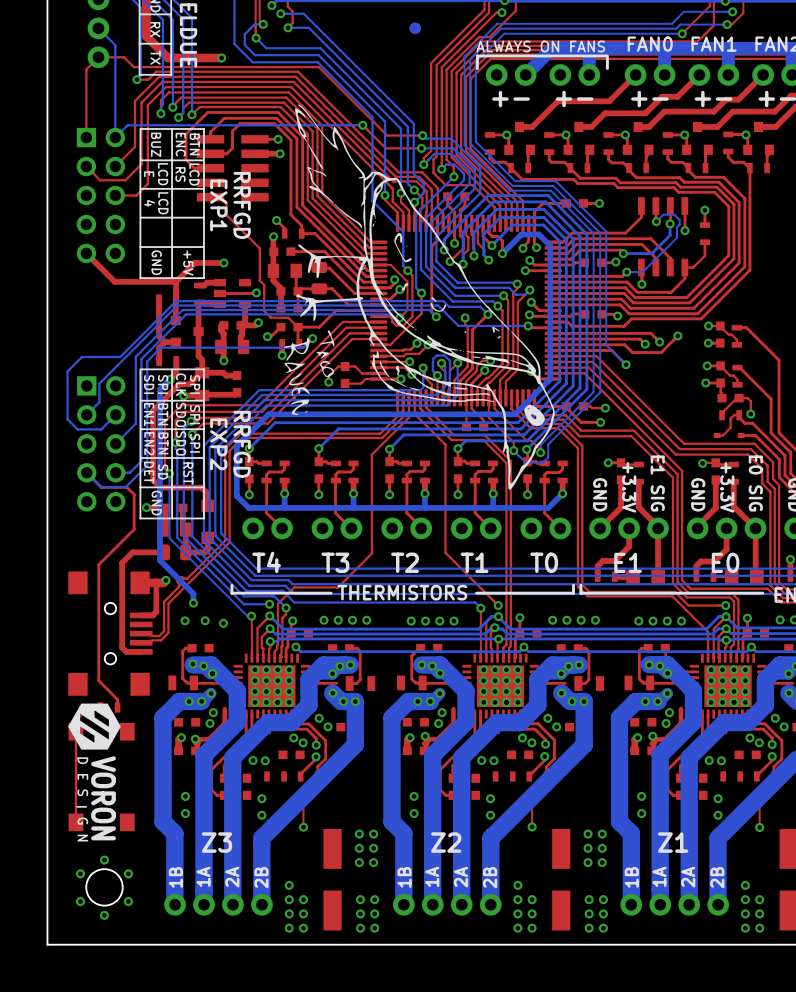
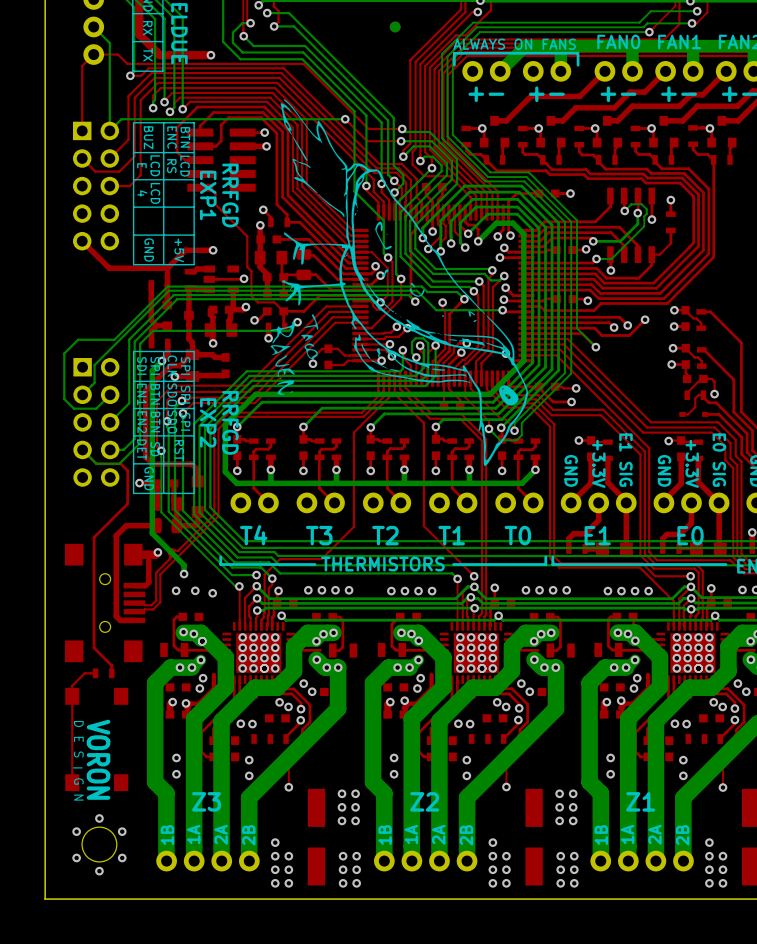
drawing: [68, 703, 121, 750] -> none

